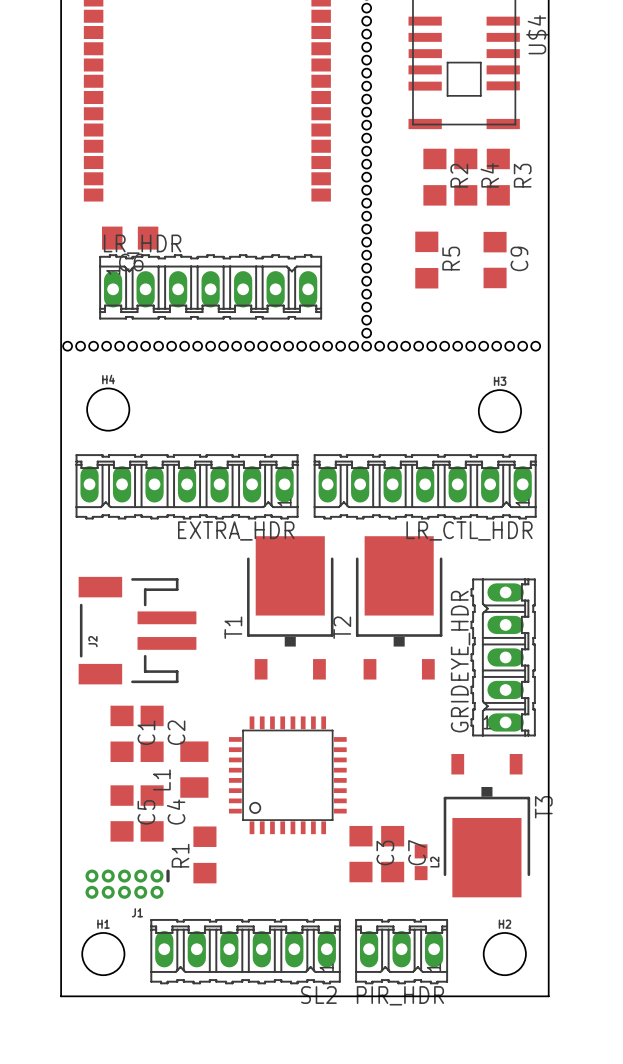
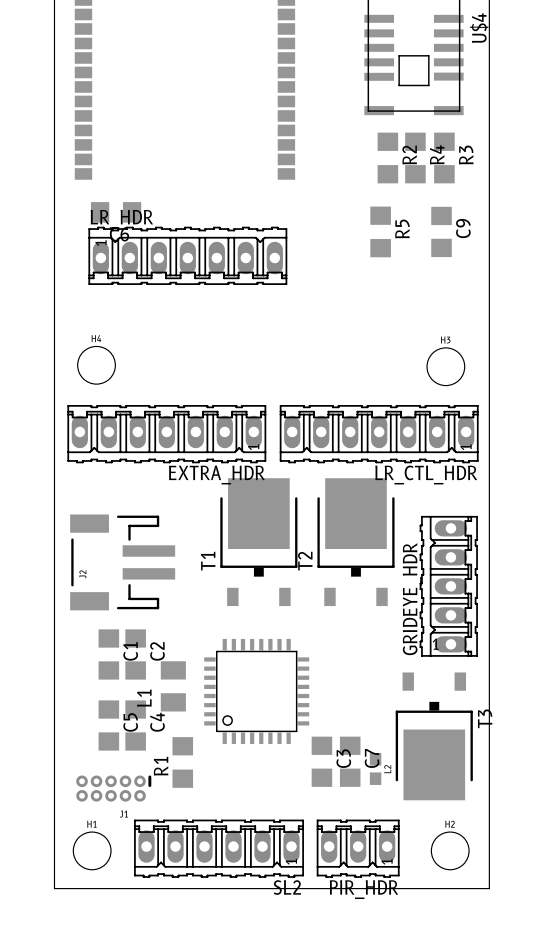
hole: (366, 8) -> none
hole: (366, 21) -> none
hole: (366, 34) -> none
hole: (366, 47) -> none
hole: (366, 60) -> none
hole: (366, 73) -> none
hole: (366, 86) -> none
hole: (366, 99) -> none
hole: (366, 112) -> none
hole: (366, 125) -> none
hole: (366, 138) -> none
hole: (366, 151) -> none
hole: (366, 164) -> none
hole: (366, 177) -> none
hole: (366, 190) -> none
hole: (366, 203) -> none
hole: (366, 216) -> none
hole: (366, 229) -> none
hole: (366, 242) -> none
hole: (366, 255) -> none
hole: (366, 268) -> none
hole: (366, 281) -> none
hole: (366, 294) -> none
hole: (366, 307) -> none
hole: (366, 320) -> none
hole: (366, 333) -> none
hole: (67, 346) -> none
hole: (80, 346) -> none
hole: (93, 346) -> none
hole: (106, 346) -> none
hole: (119, 346) -> none
hole: (132, 346) -> none
hole: (145, 346) -> none
hole: (158, 346) -> none
hole: (171, 346) -> none
hole: (184, 346) -> none
hole: (197, 346) -> none
hole: (210, 346) -> none
hole: (223, 346) -> none
hole: (236, 346) -> none
hole: (249, 346) -> none
hole: (262, 346) -> none
hole: (275, 346) -> none
hole: (288, 346) -> none
hole: (301, 346) -> none
hole: (314, 346) -> none
hole: (327, 346) -> none
hole: (340, 346) -> none
hole: (353, 346) -> none
hole: (366, 346) -> none
hole: (379, 346) -> none
hole: (392, 346) -> none
hole: (405, 346) -> none
hole: (418, 346) -> none
hole: (431, 346) -> none
hole: (444, 346) -> none
hole: (457, 346) -> none
hole: (470, 346) -> none
hole: (483, 346) -> none
hole: (496, 346) -> none
hole: (509, 346) -> none
hole: (522, 346) -> none
hole: (535, 346) -> none

